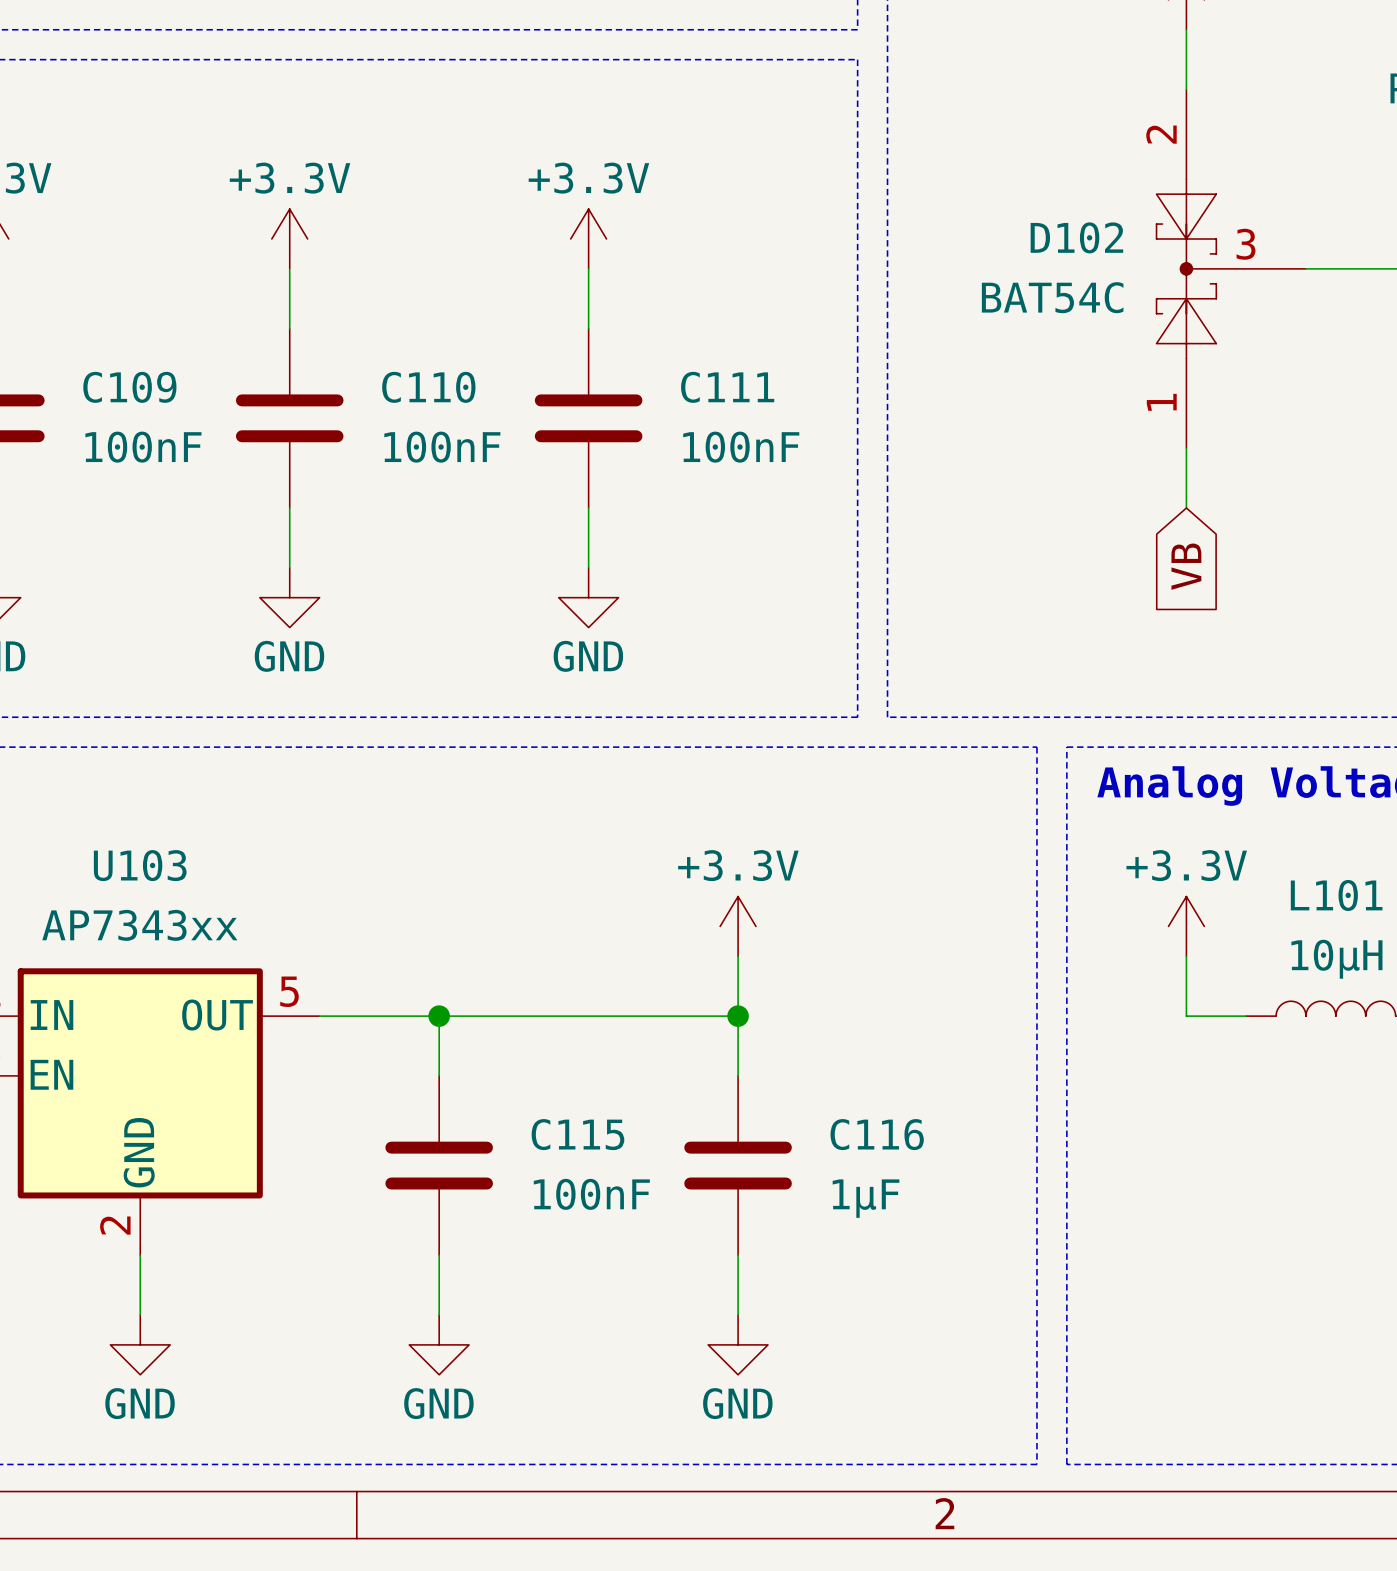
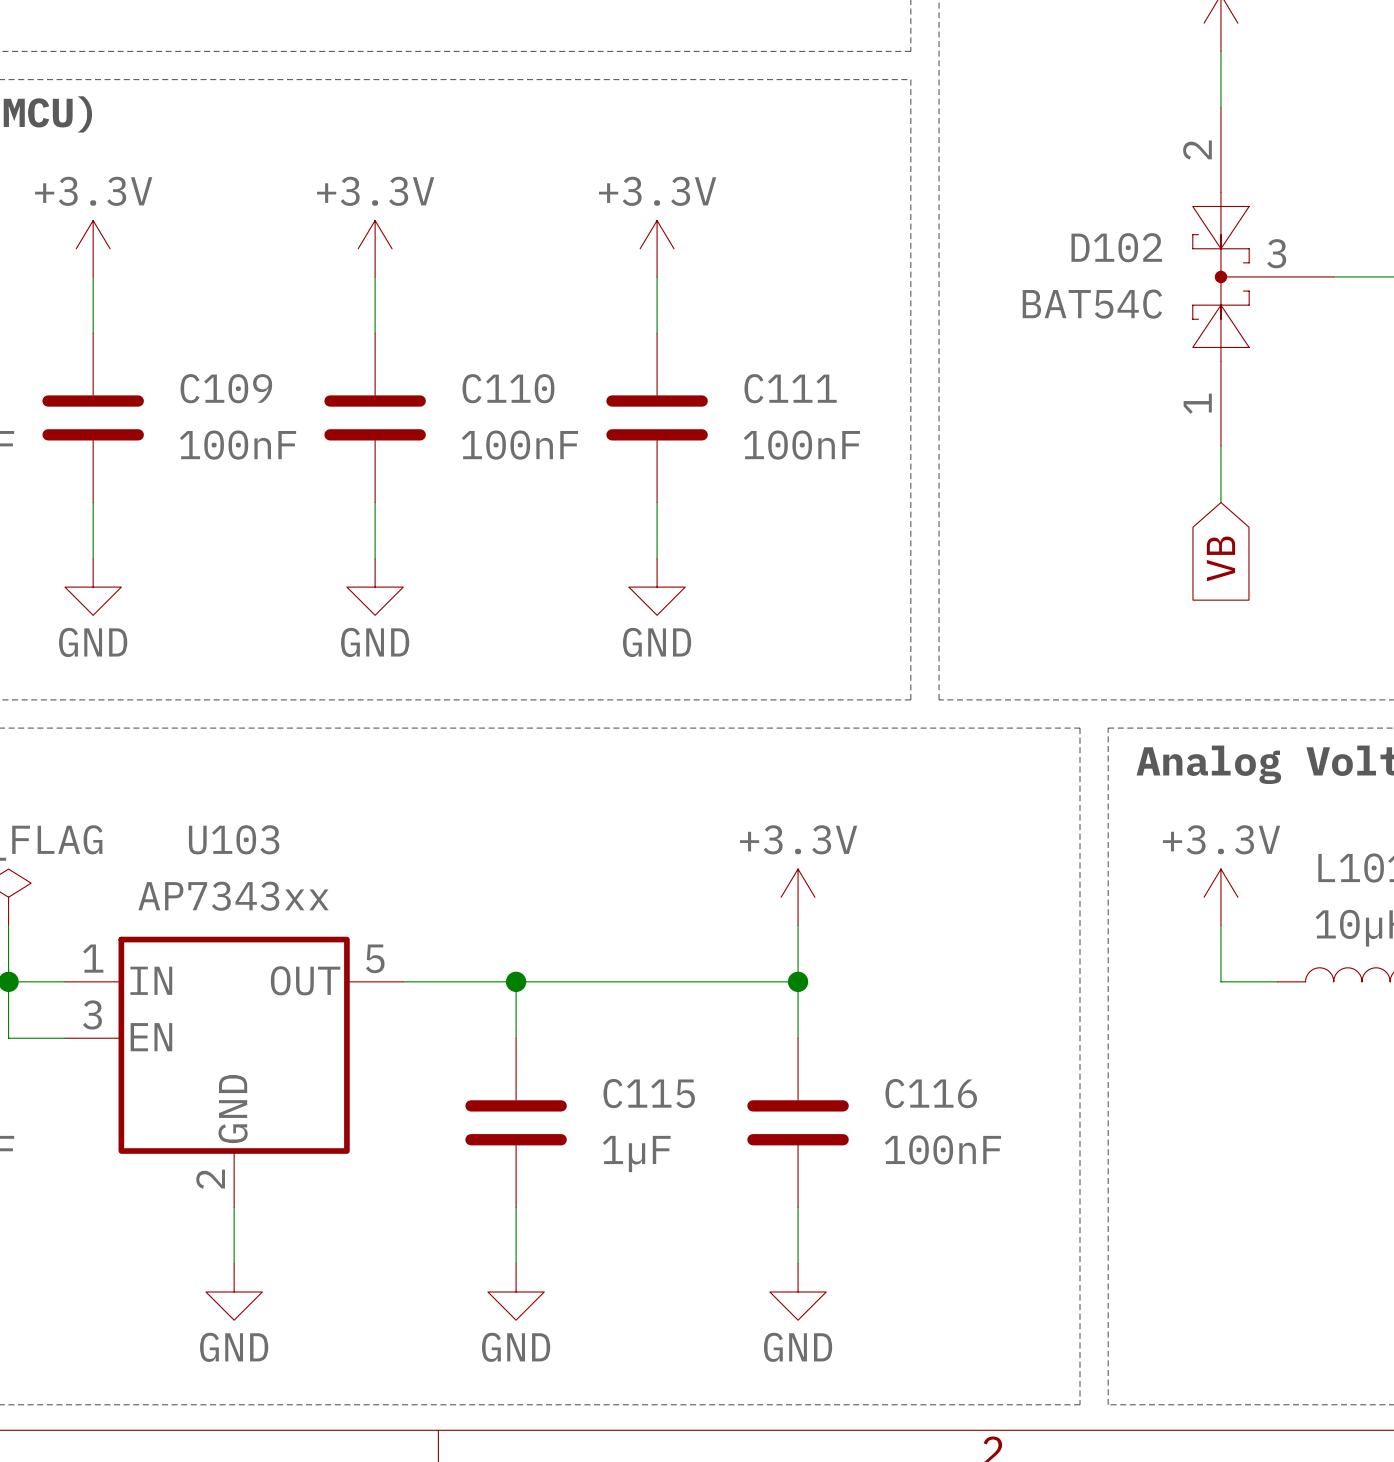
C115 value: 100nF (591, 1194) -> 1µF (636, 1154)
C116 value: 1µF (866, 1198) -> 100nF (942, 1149)

